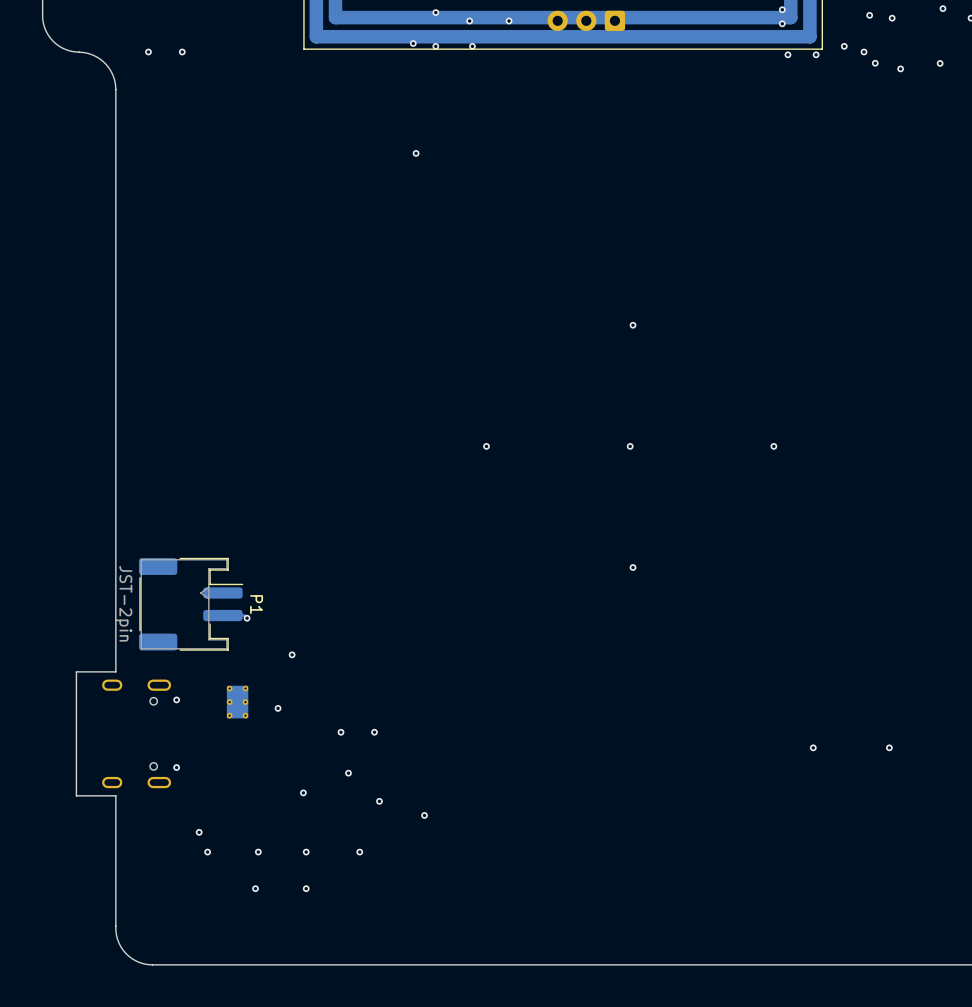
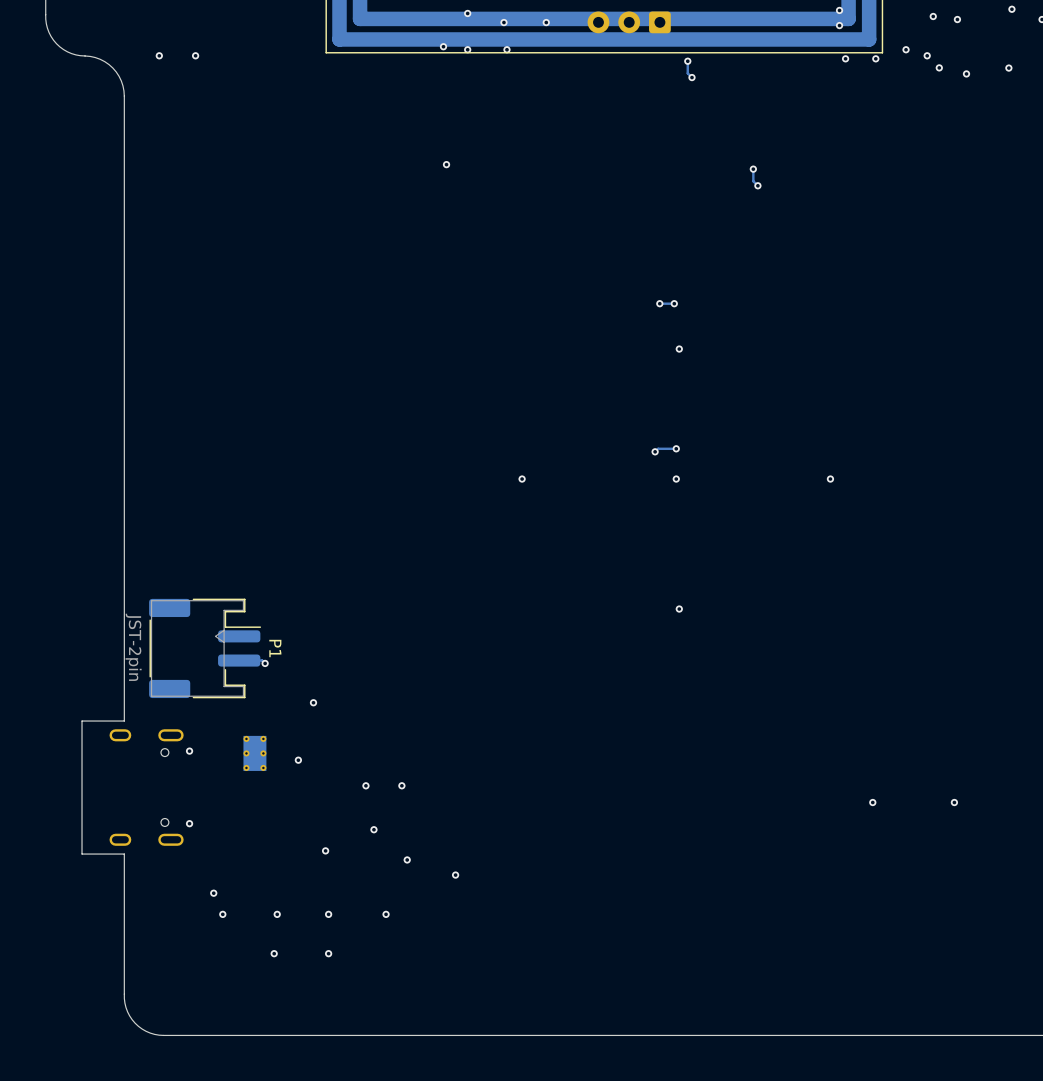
track: none -> (687, 61) (687, 73) (691, 77)
via: none -> (687, 61)
via: none -> (691, 77)
track: none -> (753, 169) (753, 181) (757, 185)
via: none -> (753, 169)
via: none -> (757, 185)
via: none -> (659, 303)
track: none -> (674, 303) (659, 303)
via: none -> (674, 303)
track: none -> (676, 448) (658, 448) (655, 451)
via: none -> (676, 448)
via: none -> (655, 451)

